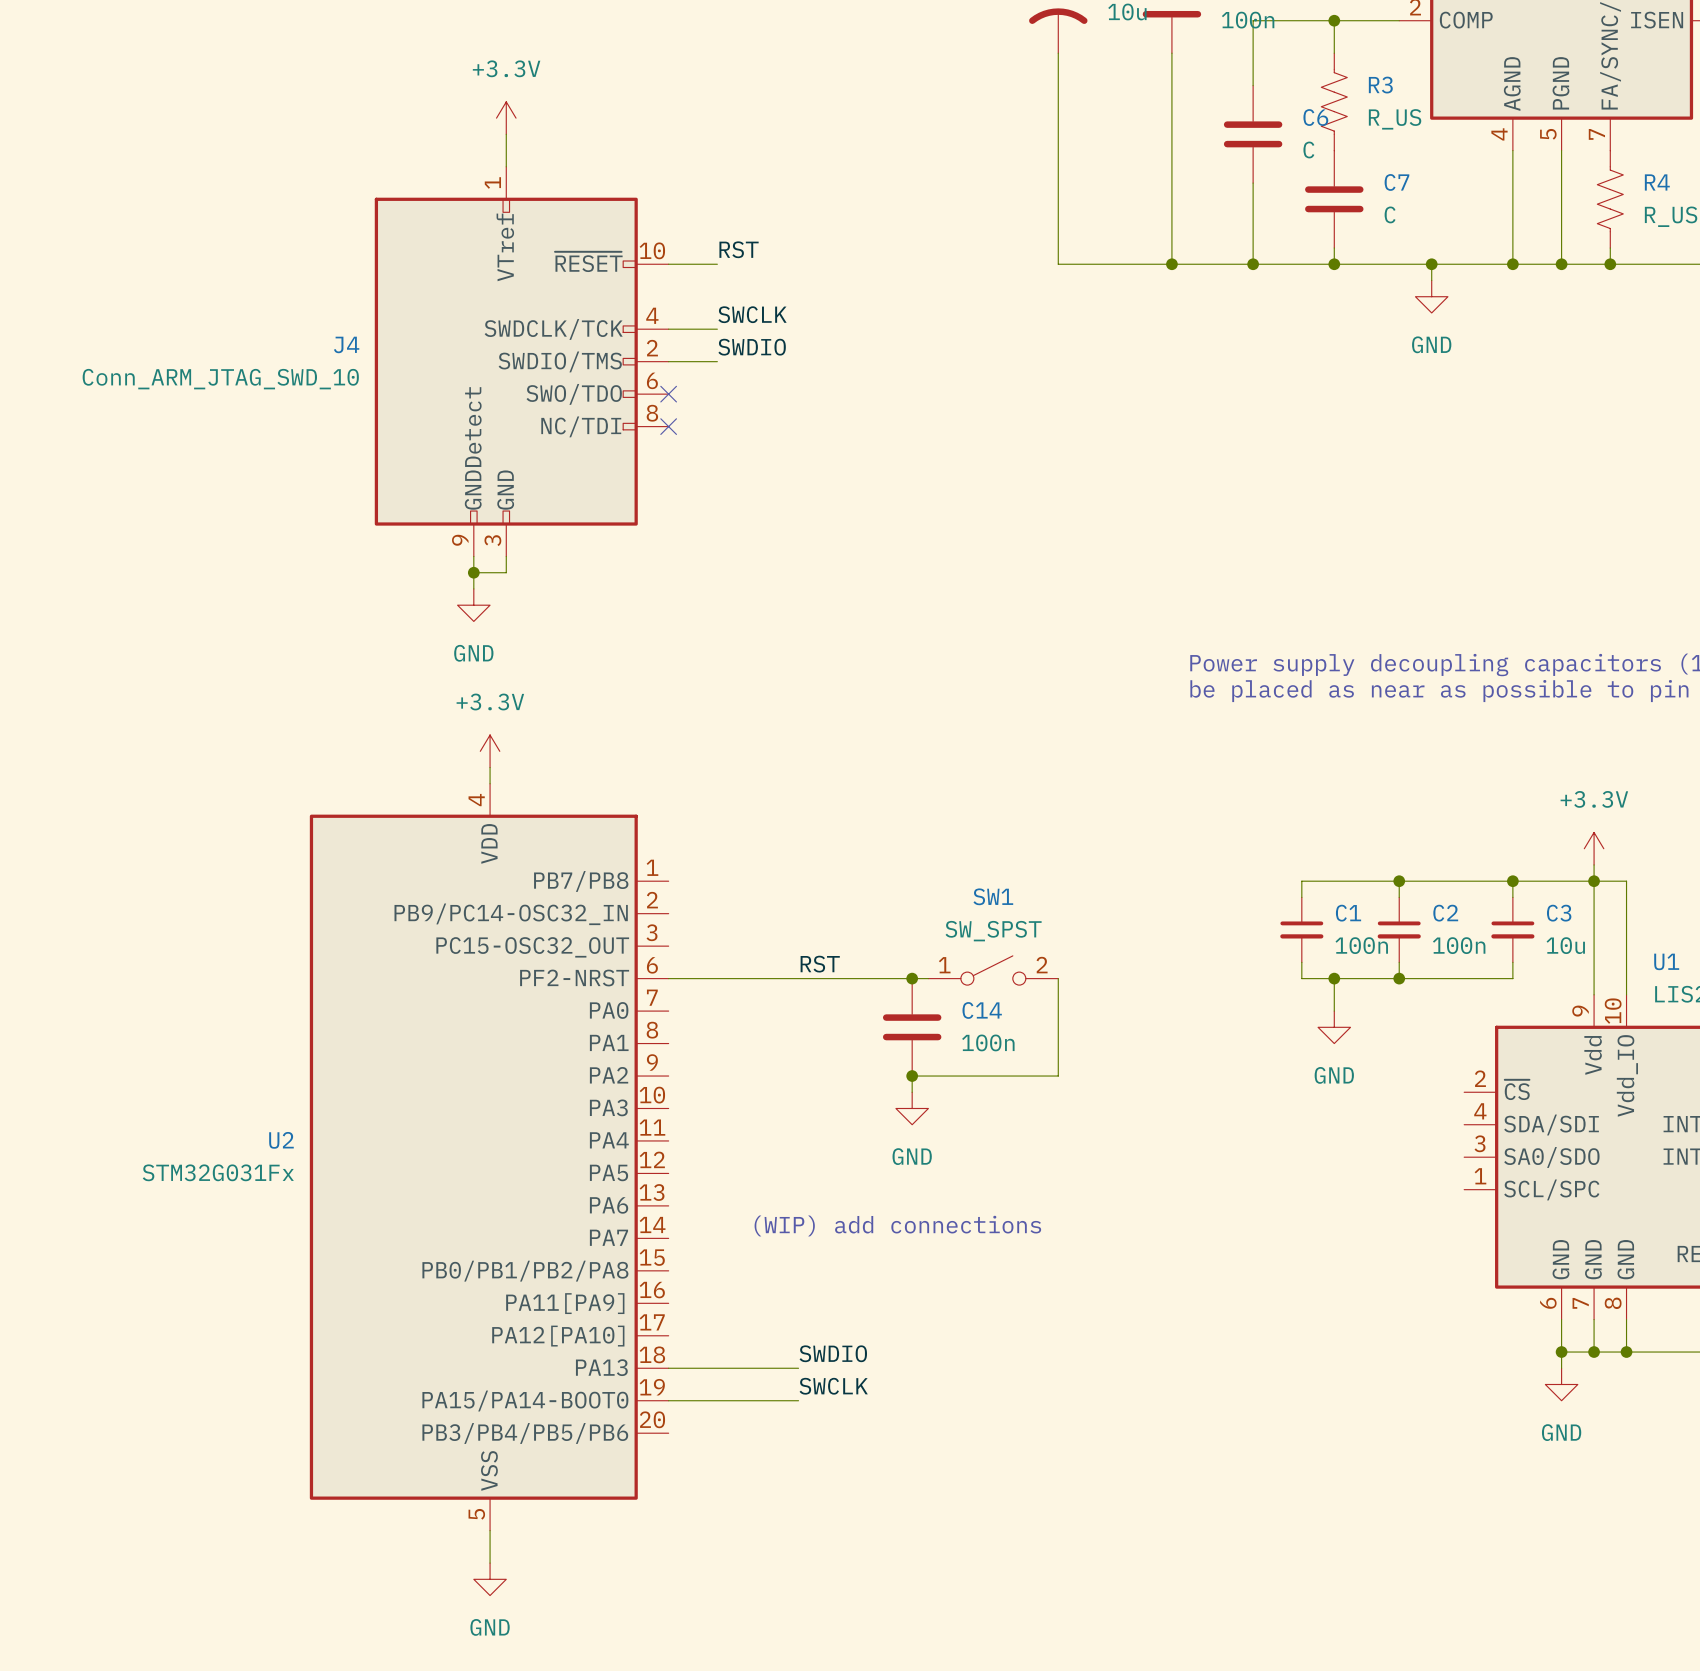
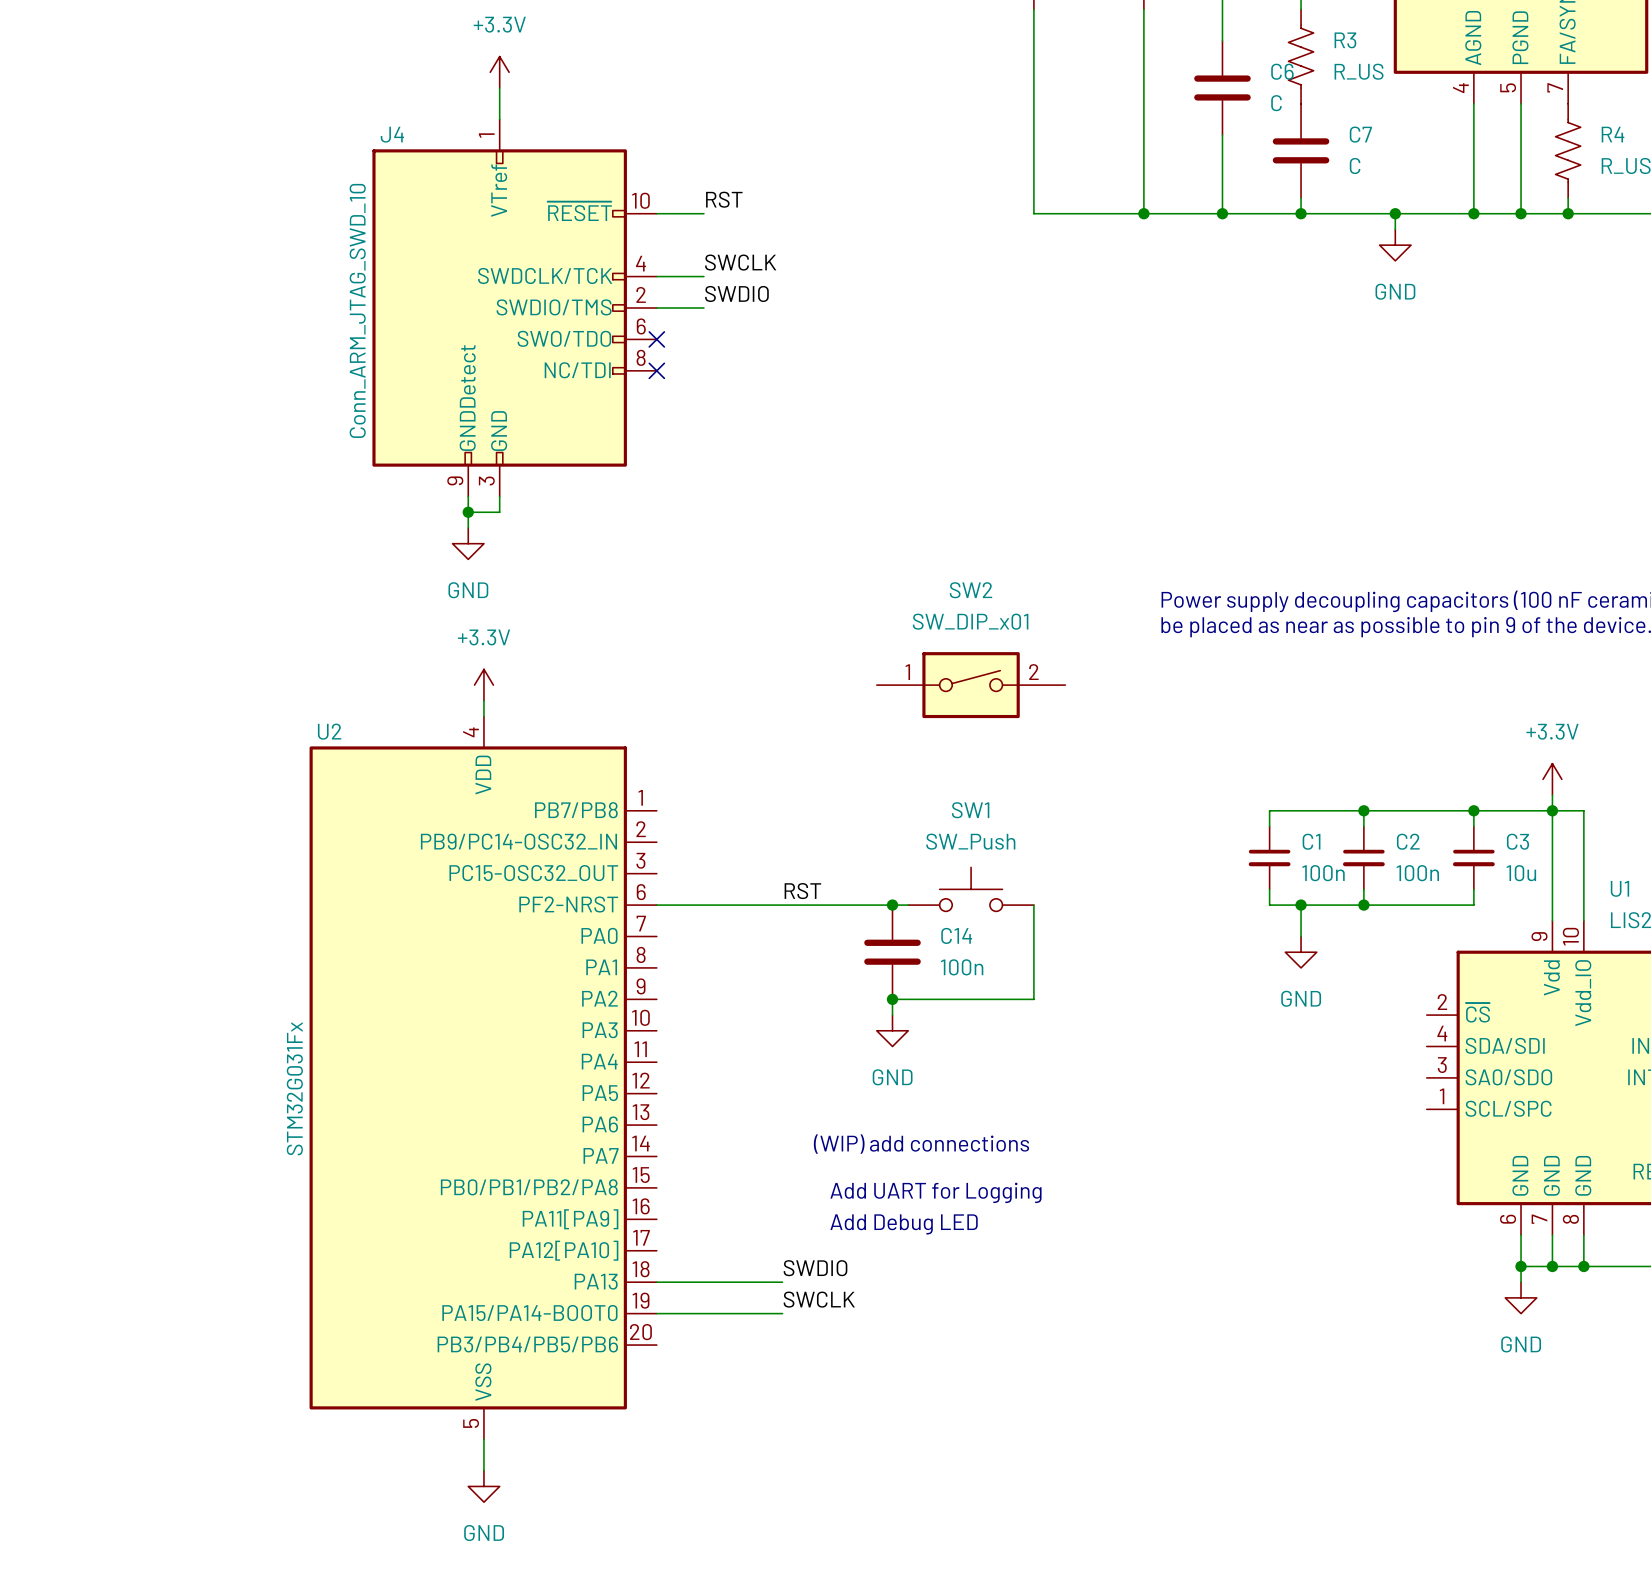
J4 name position: J4 (346, 344) -> J4 (392, 134)
J4 value rotation: 0° (220, 379) -> 90° counterclockwise (357, 310)
SW2: none -> SW_DIP_x01 (971, 685)
SW1 value: SW_SPST (993, 931) -> SW_Push (970, 841)
SW1 symbol: [928, 955, 1059, 986] -> [908, 867, 1034, 912]
U2 name position: U2 (281, 1140) -> U2 (329, 731)
U2 value rotation: 0° (218, 1172) -> 90° counterclockwise (294, 1088)
text position: (WIP) add connections (897, 1225) -> (WIP) add connections (921, 1144)
text: none -> Add UART for Logging (935, 1192)
text: none -> Add Debug LED (904, 1224)

